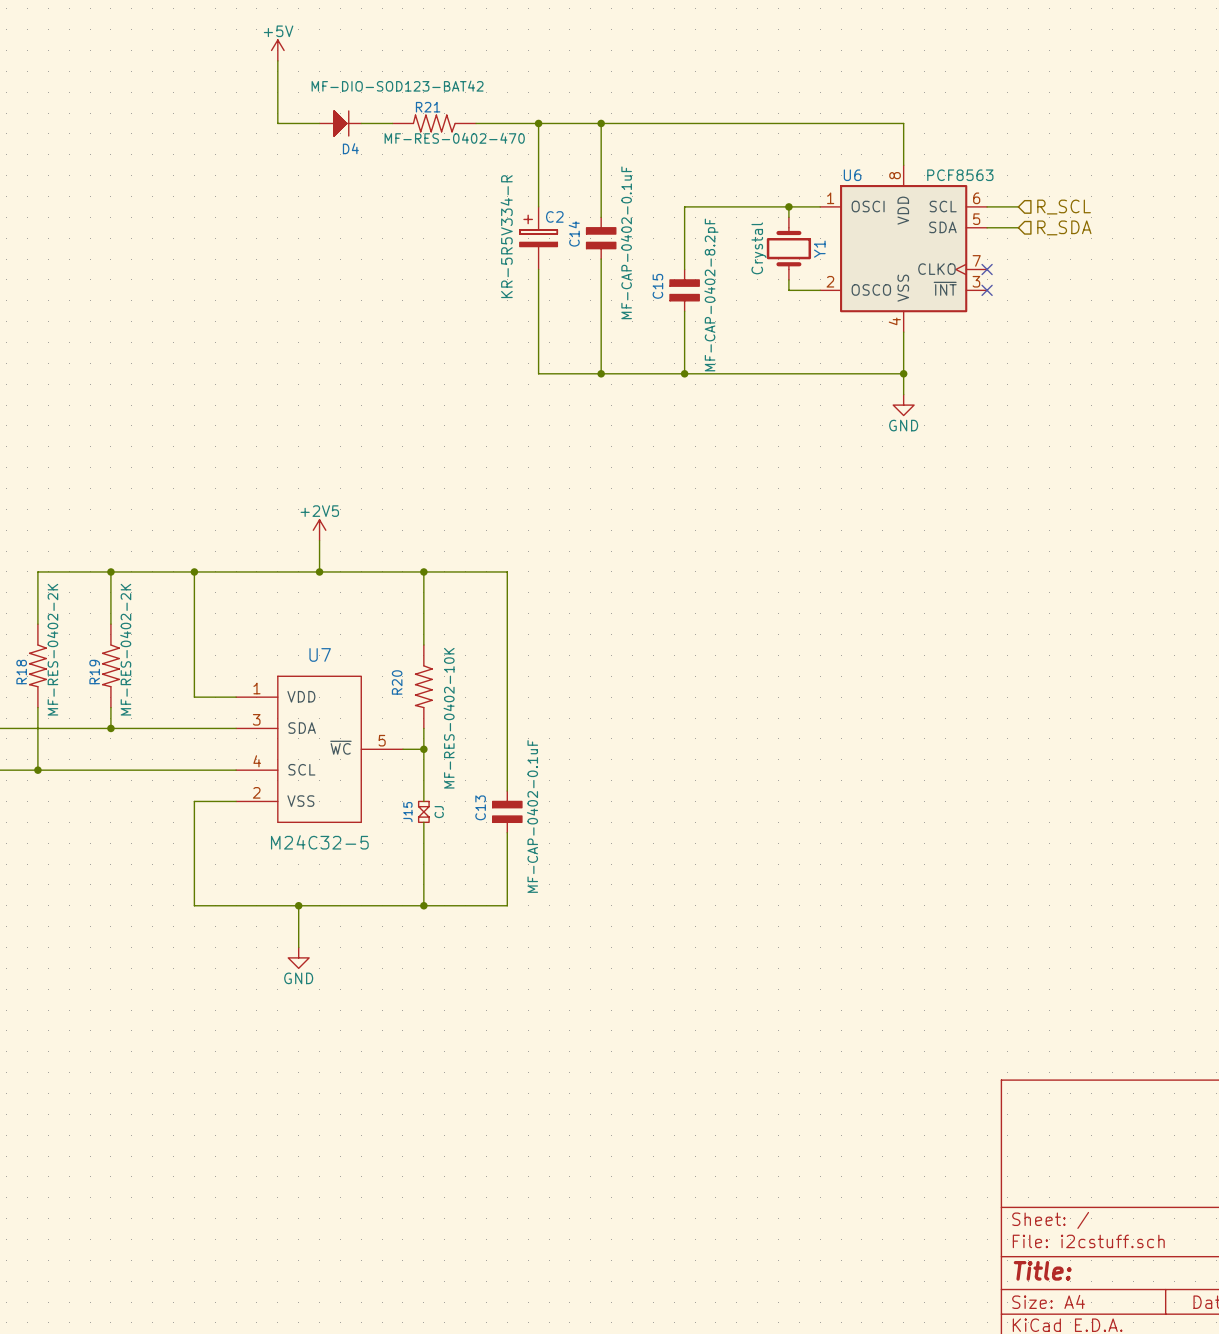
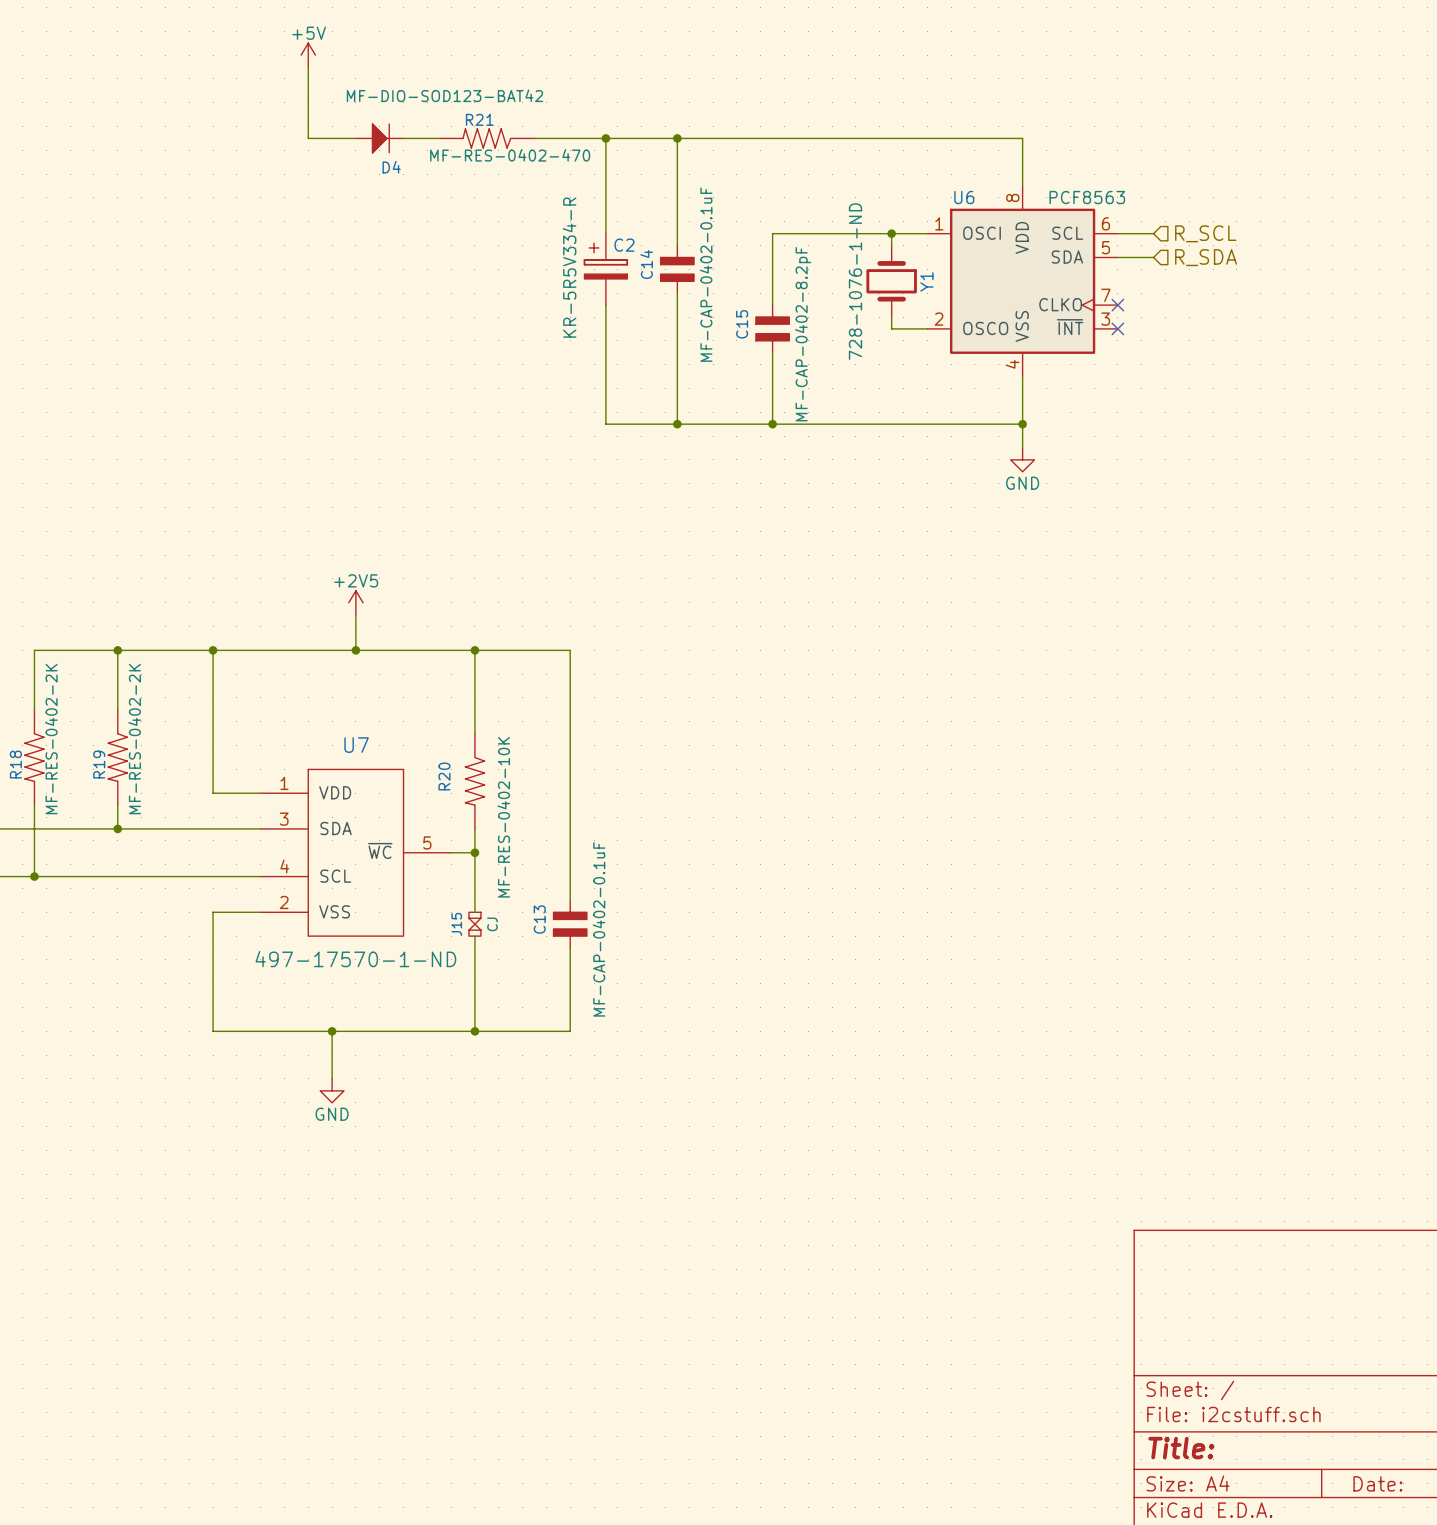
Y1 value: Crystal (758, 248) -> 728-1076-1-ND (855, 281)
U7 value: M24C32-5 (319, 842) -> 497-17570-1-ND (355, 959)

